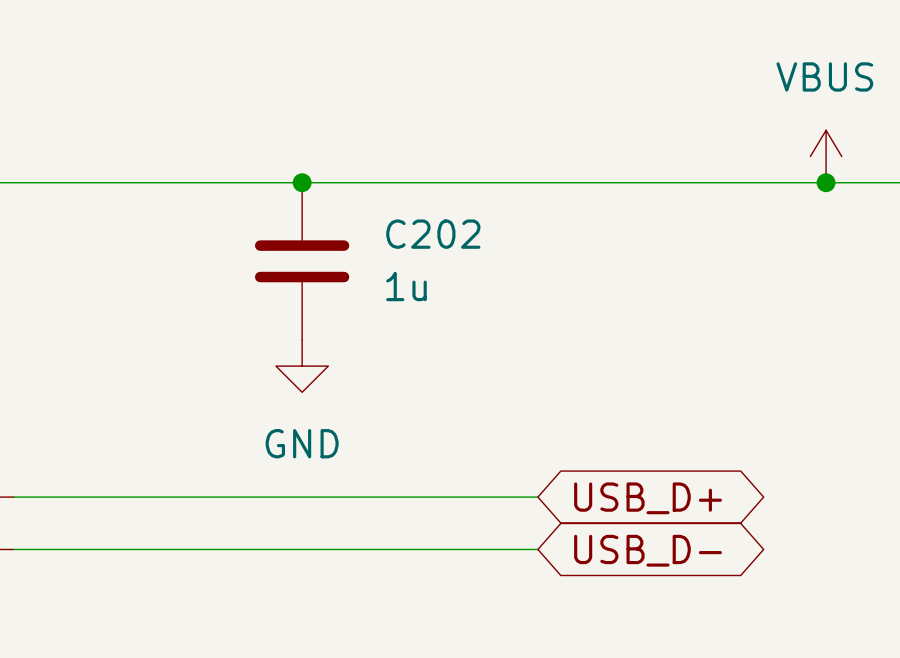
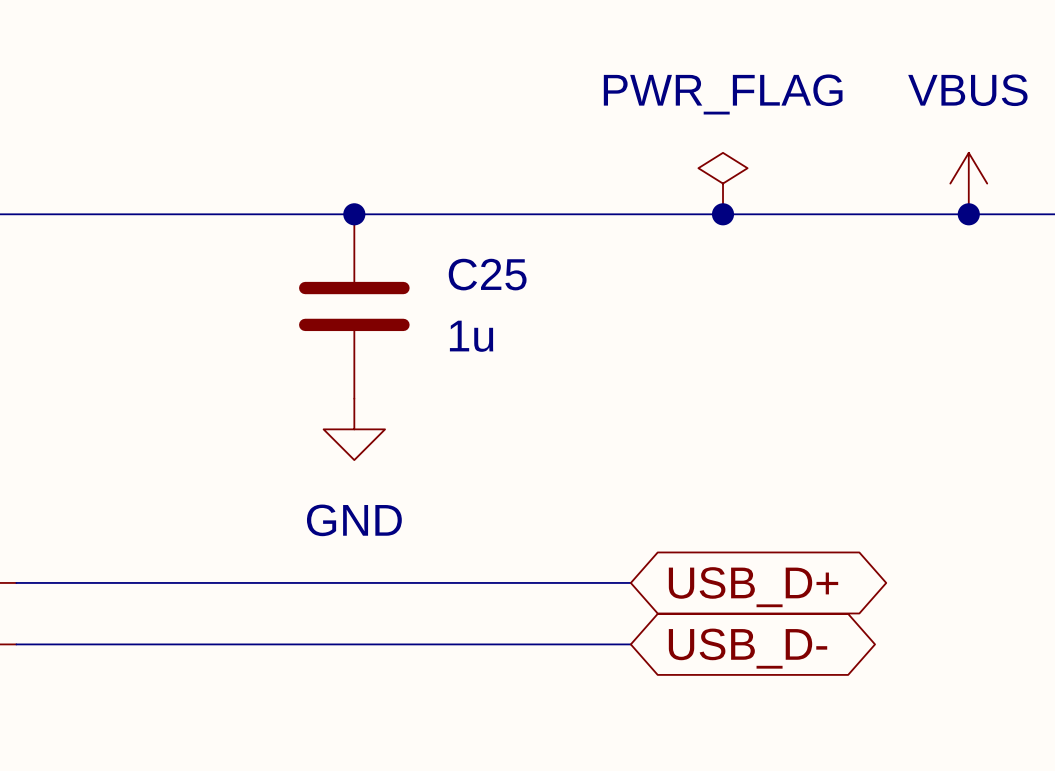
power symbol: none -> PWR_FLAG (723, 183)
junction: none -> (723, 214)
C202 name: C202 (433, 234) -> C25 (487, 274)

